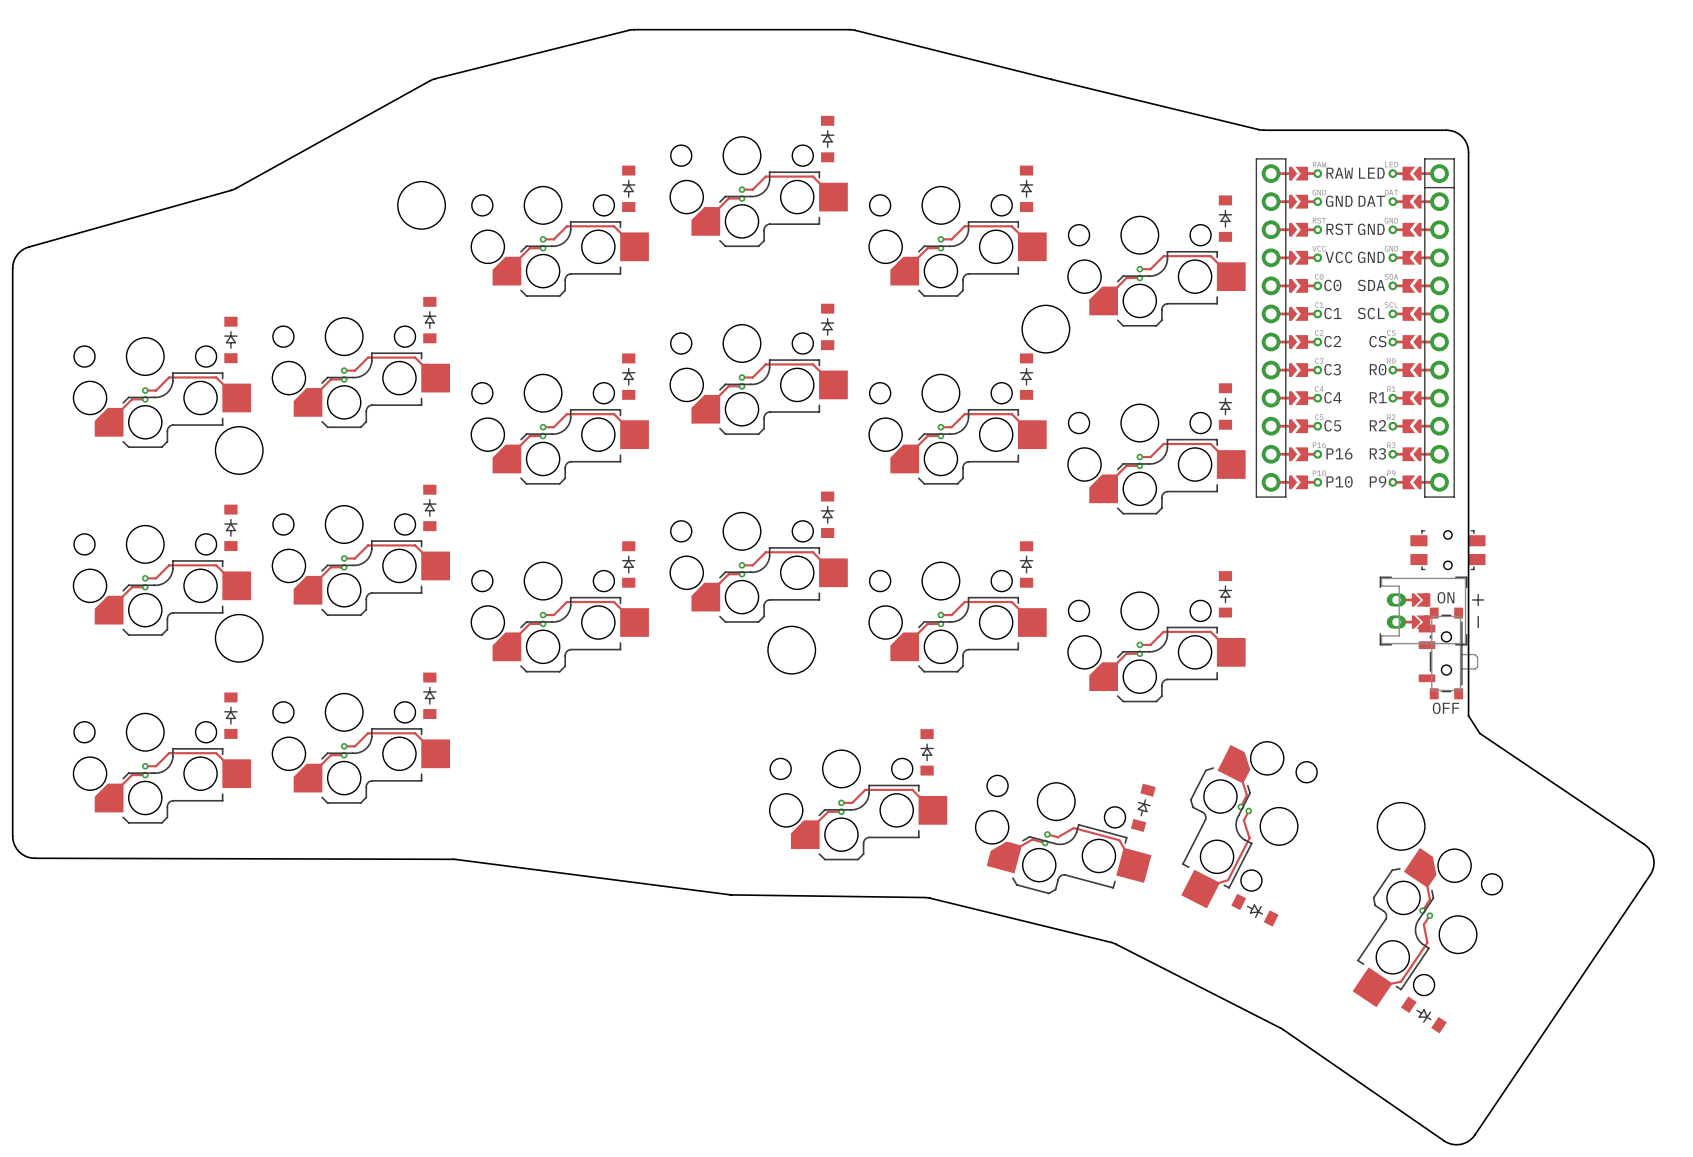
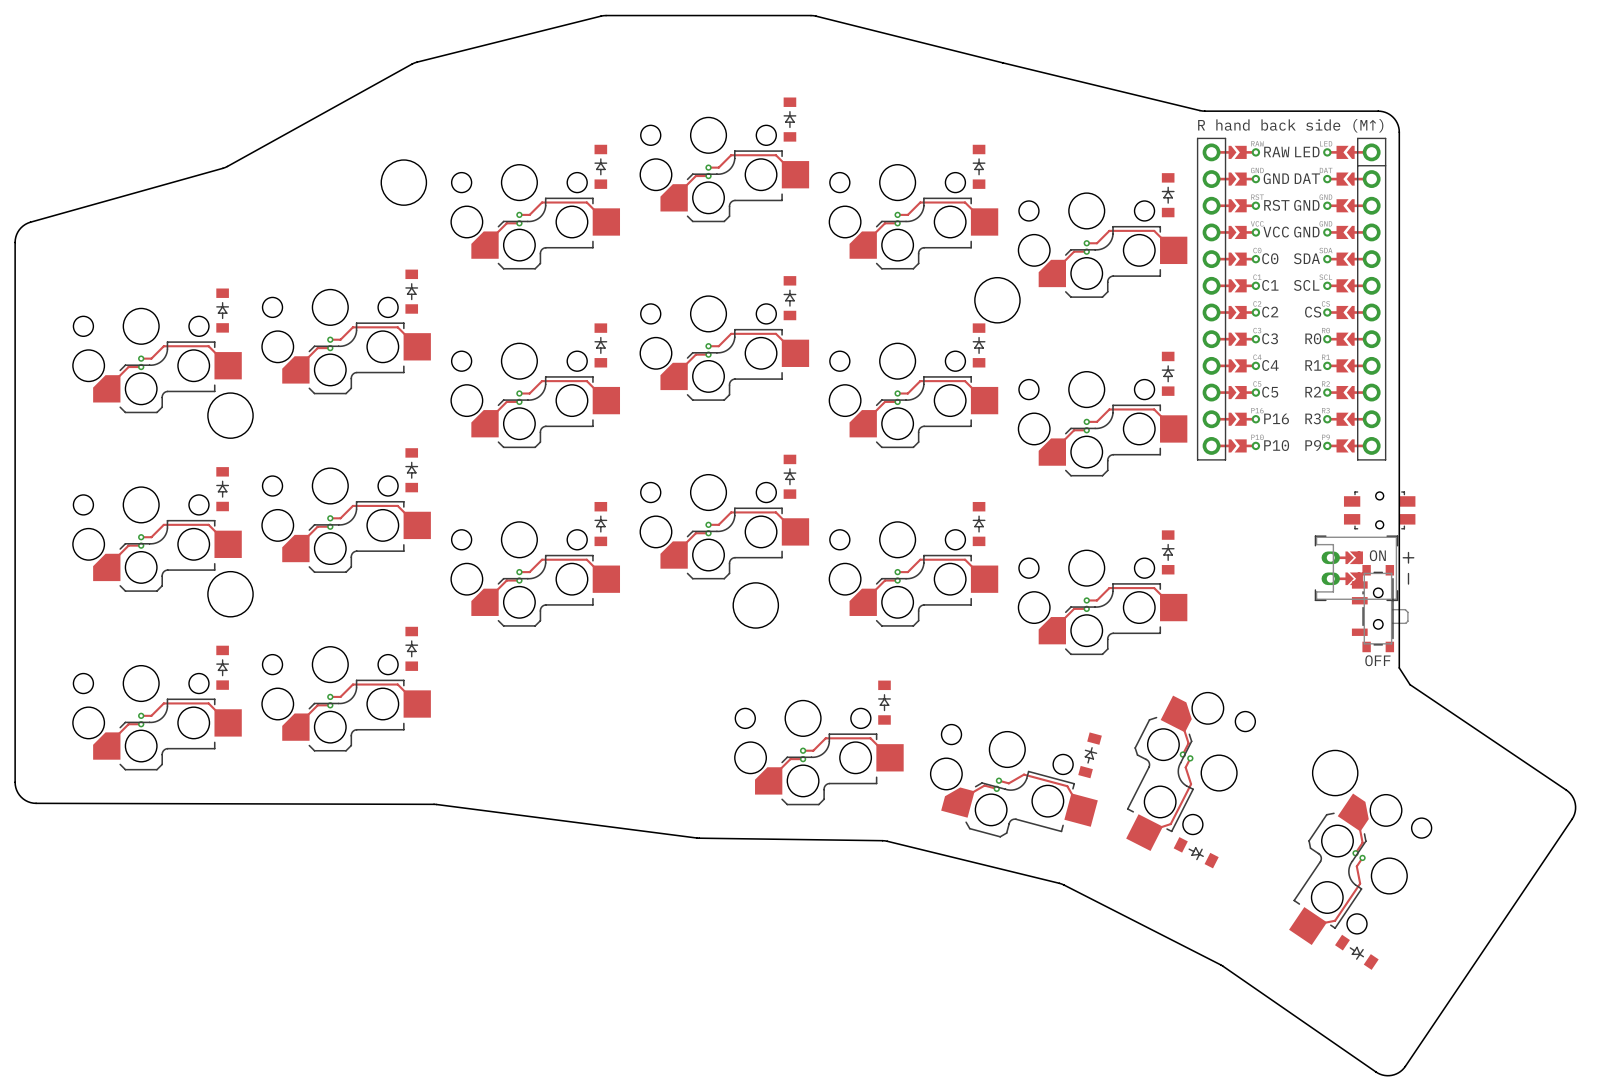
part text: none -> R hand back side (M↑) (1290, 125)

